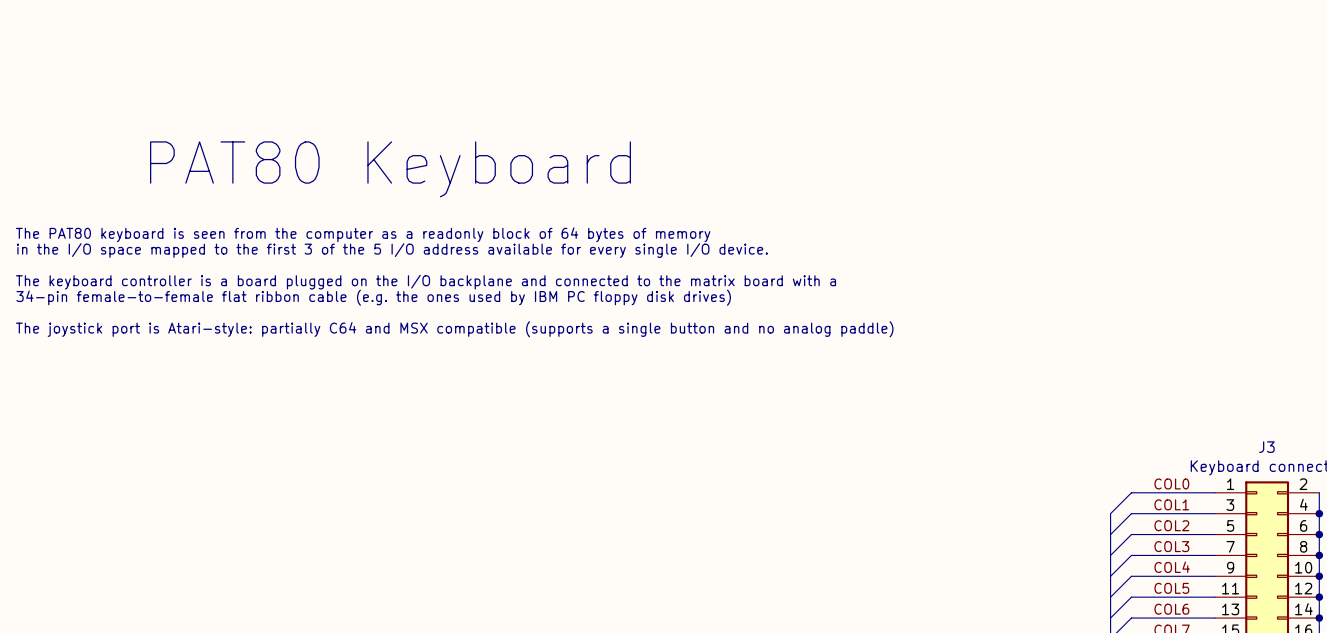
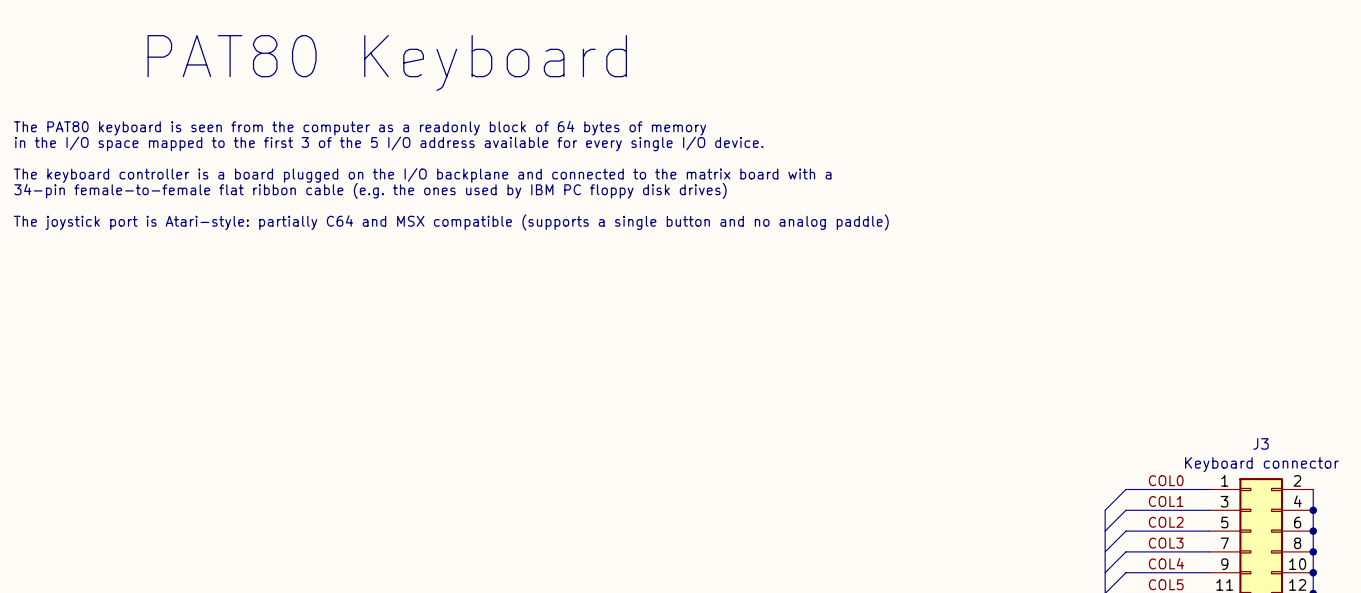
text position: PAT80 Keyboard (390, 169) -> PAT80 Keyboard (387, 62)
text position: The PAT80 keyboard is seen from the computer as a readonly block of 64 bytes of memory (363, 234) -> The PAT80 keyboard is seen from the computer as a readonly block of 64 bytes of memory (360, 128)
text position: in the I/O space mapped to the first 3 of the 5 I/O address available for every single I/O device. (392, 250) -> in the I/O space mapped to the first 3 of the 5 I/O address available for every single I/O device. (389, 143)
text position: The keyboard controller is a board plugged on the I/O backplane and connected to the matrix board with a (426, 282) -> The keyboard controller is a board plugged on the I/O backplane and connected to the matrix board with a (422, 175)
text position: 34-pin female-to-female flat ribbon cable (e.g. the ones used by IBM PC floppy disk drives) (373, 297) -> 34-pin female-to-female flat ribbon cable (e.g. the ones used by IBM PC floppy disk drives) (370, 190)
text position: The joystick port is Atari-style: partially C64 and MSX compatible (supports a single button and no analog paddle) (454, 329) -> The joystick port is Atari-style: partially C64 and MSX compatible (supports a single button and no analog paddle) (451, 222)

